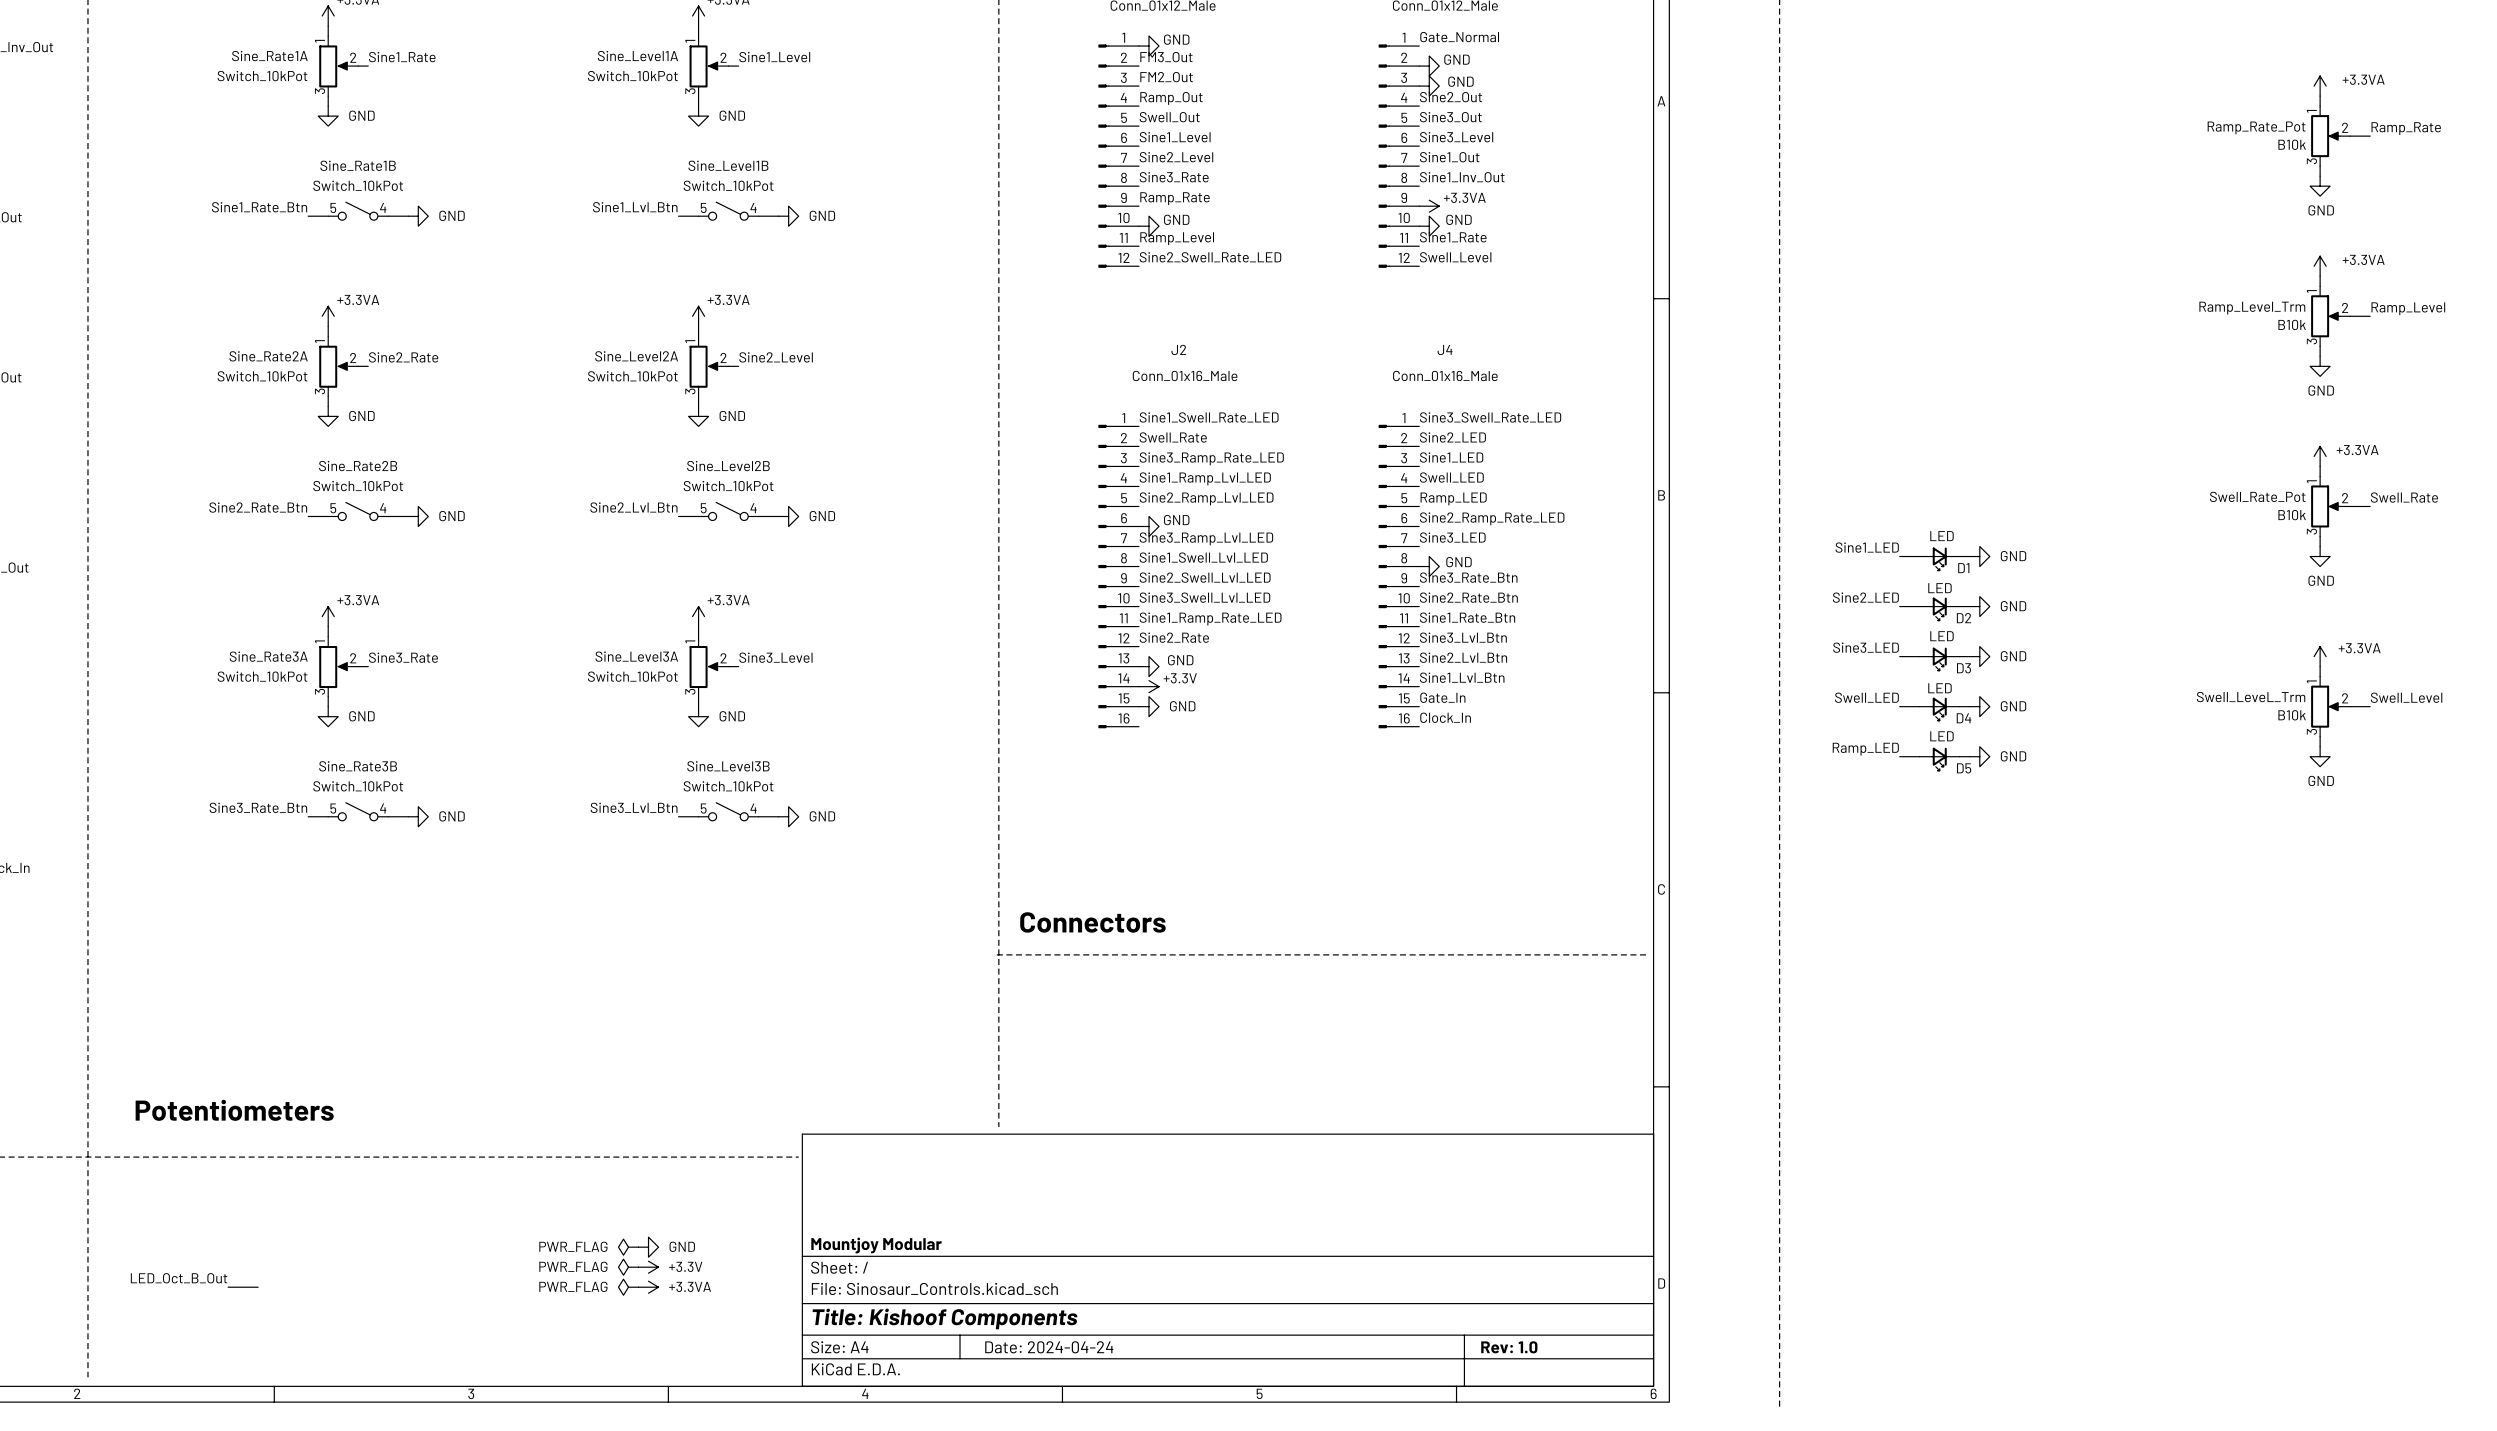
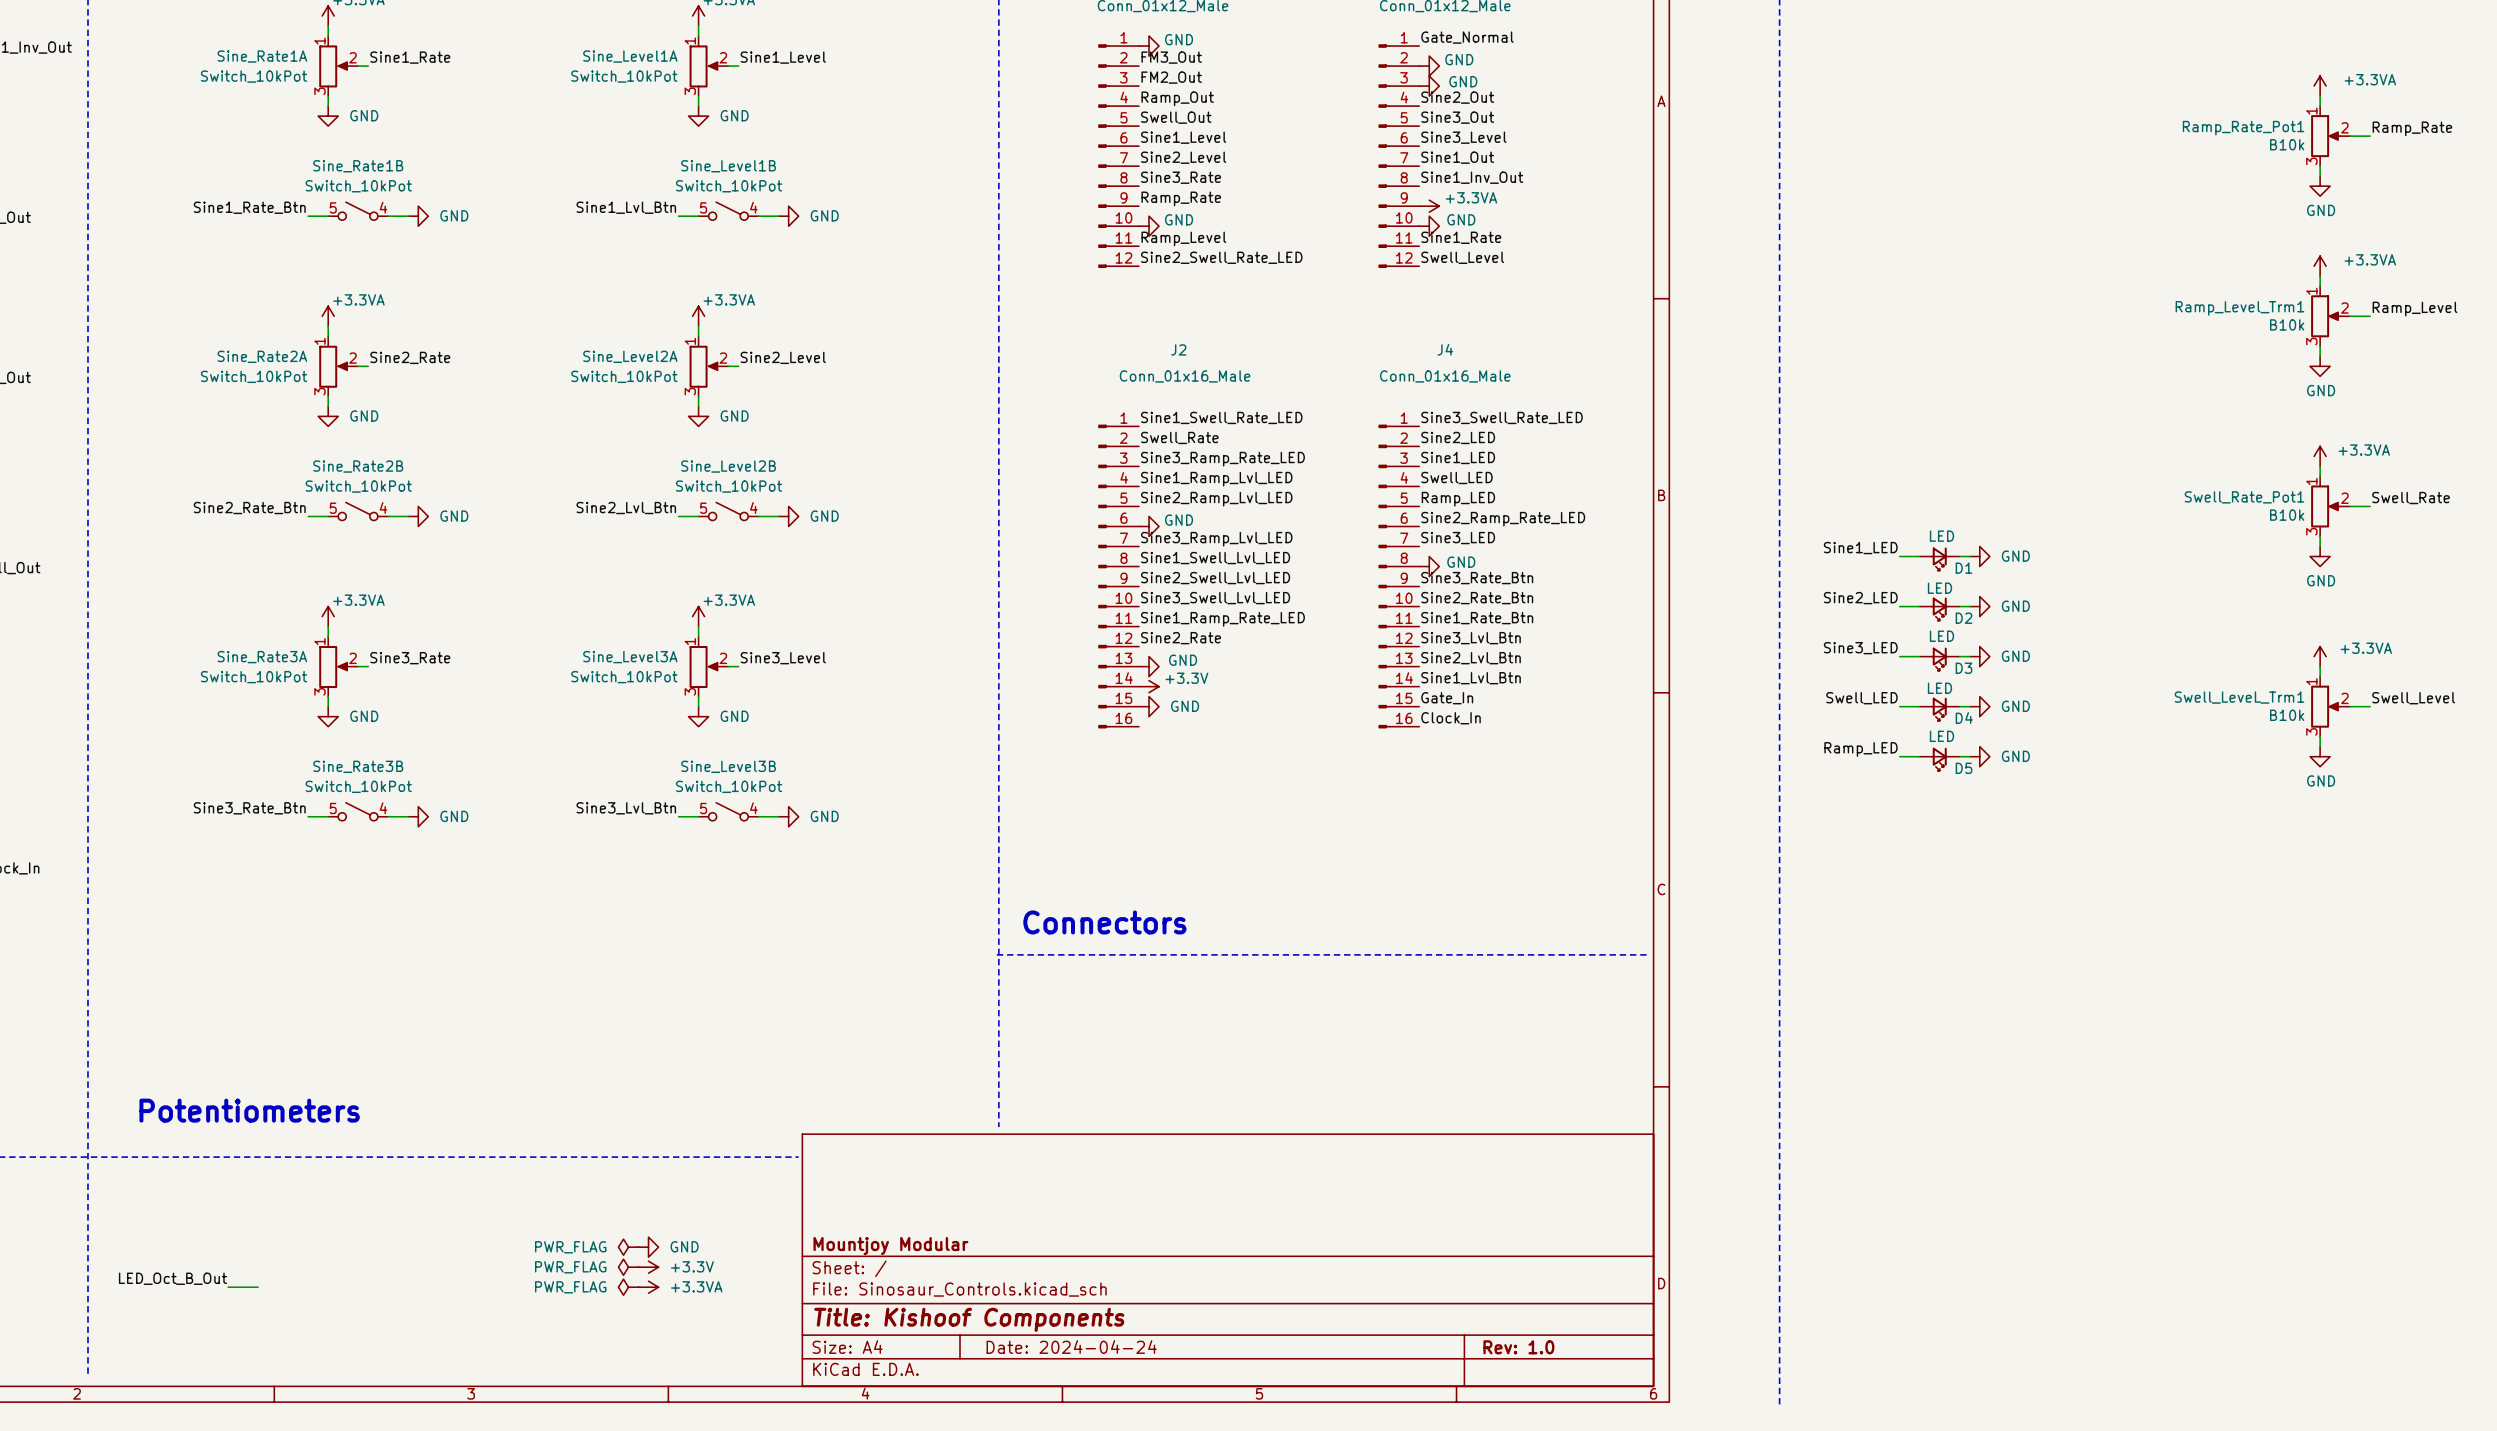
Ramp_Rate_Pot name: Ramp_Rate_Pot (2256, 127) -> Ramp_Rate_Pot1 (2243, 128)
Ramp_Level_Trm name: Ramp_Level_Trm (2252, 308) -> Ramp_Level_Trm1 (2239, 308)
Swell_Rate_Pot name: Swell_Rate_Pot (2257, 496) -> Swell_Rate_Pot1 (2244, 497)
Swell_LeveL_Trm name: Swell_LeveL_Trm (2251, 697) -> Swell_LeveL_Trm1 (2239, 697)

